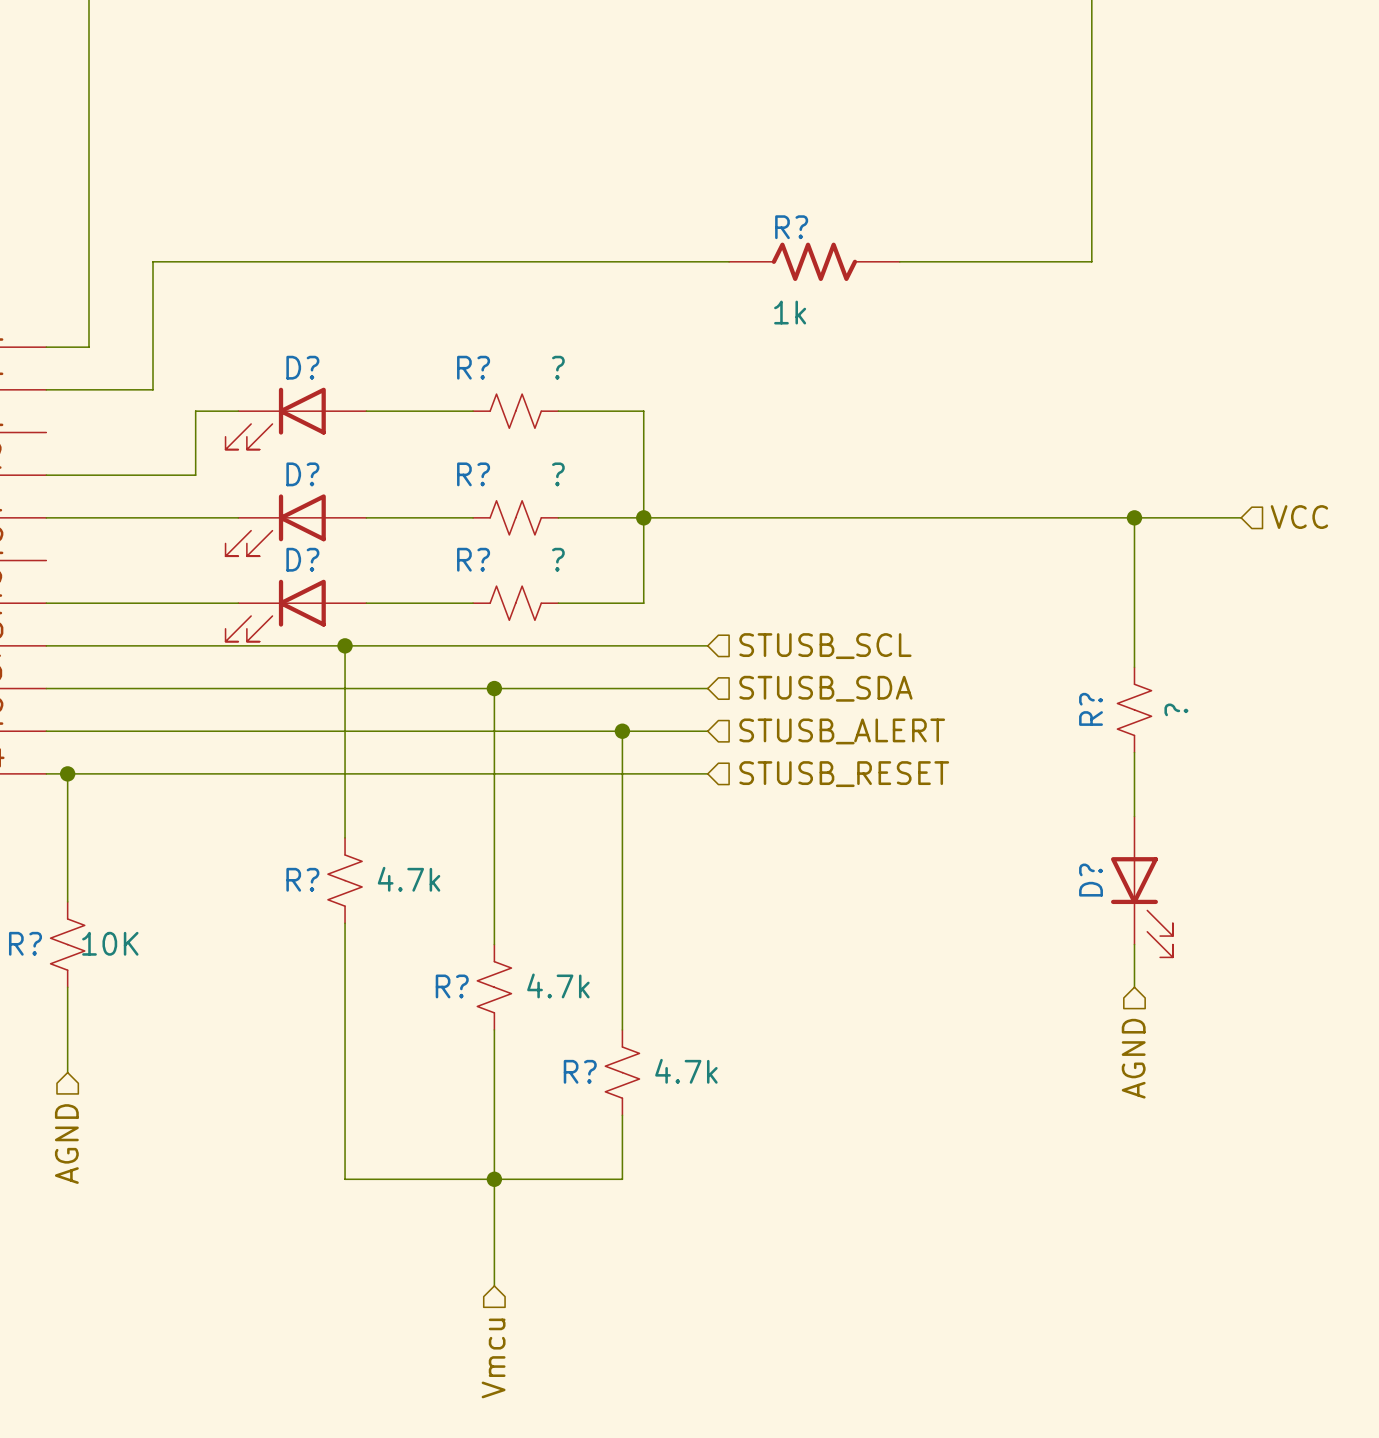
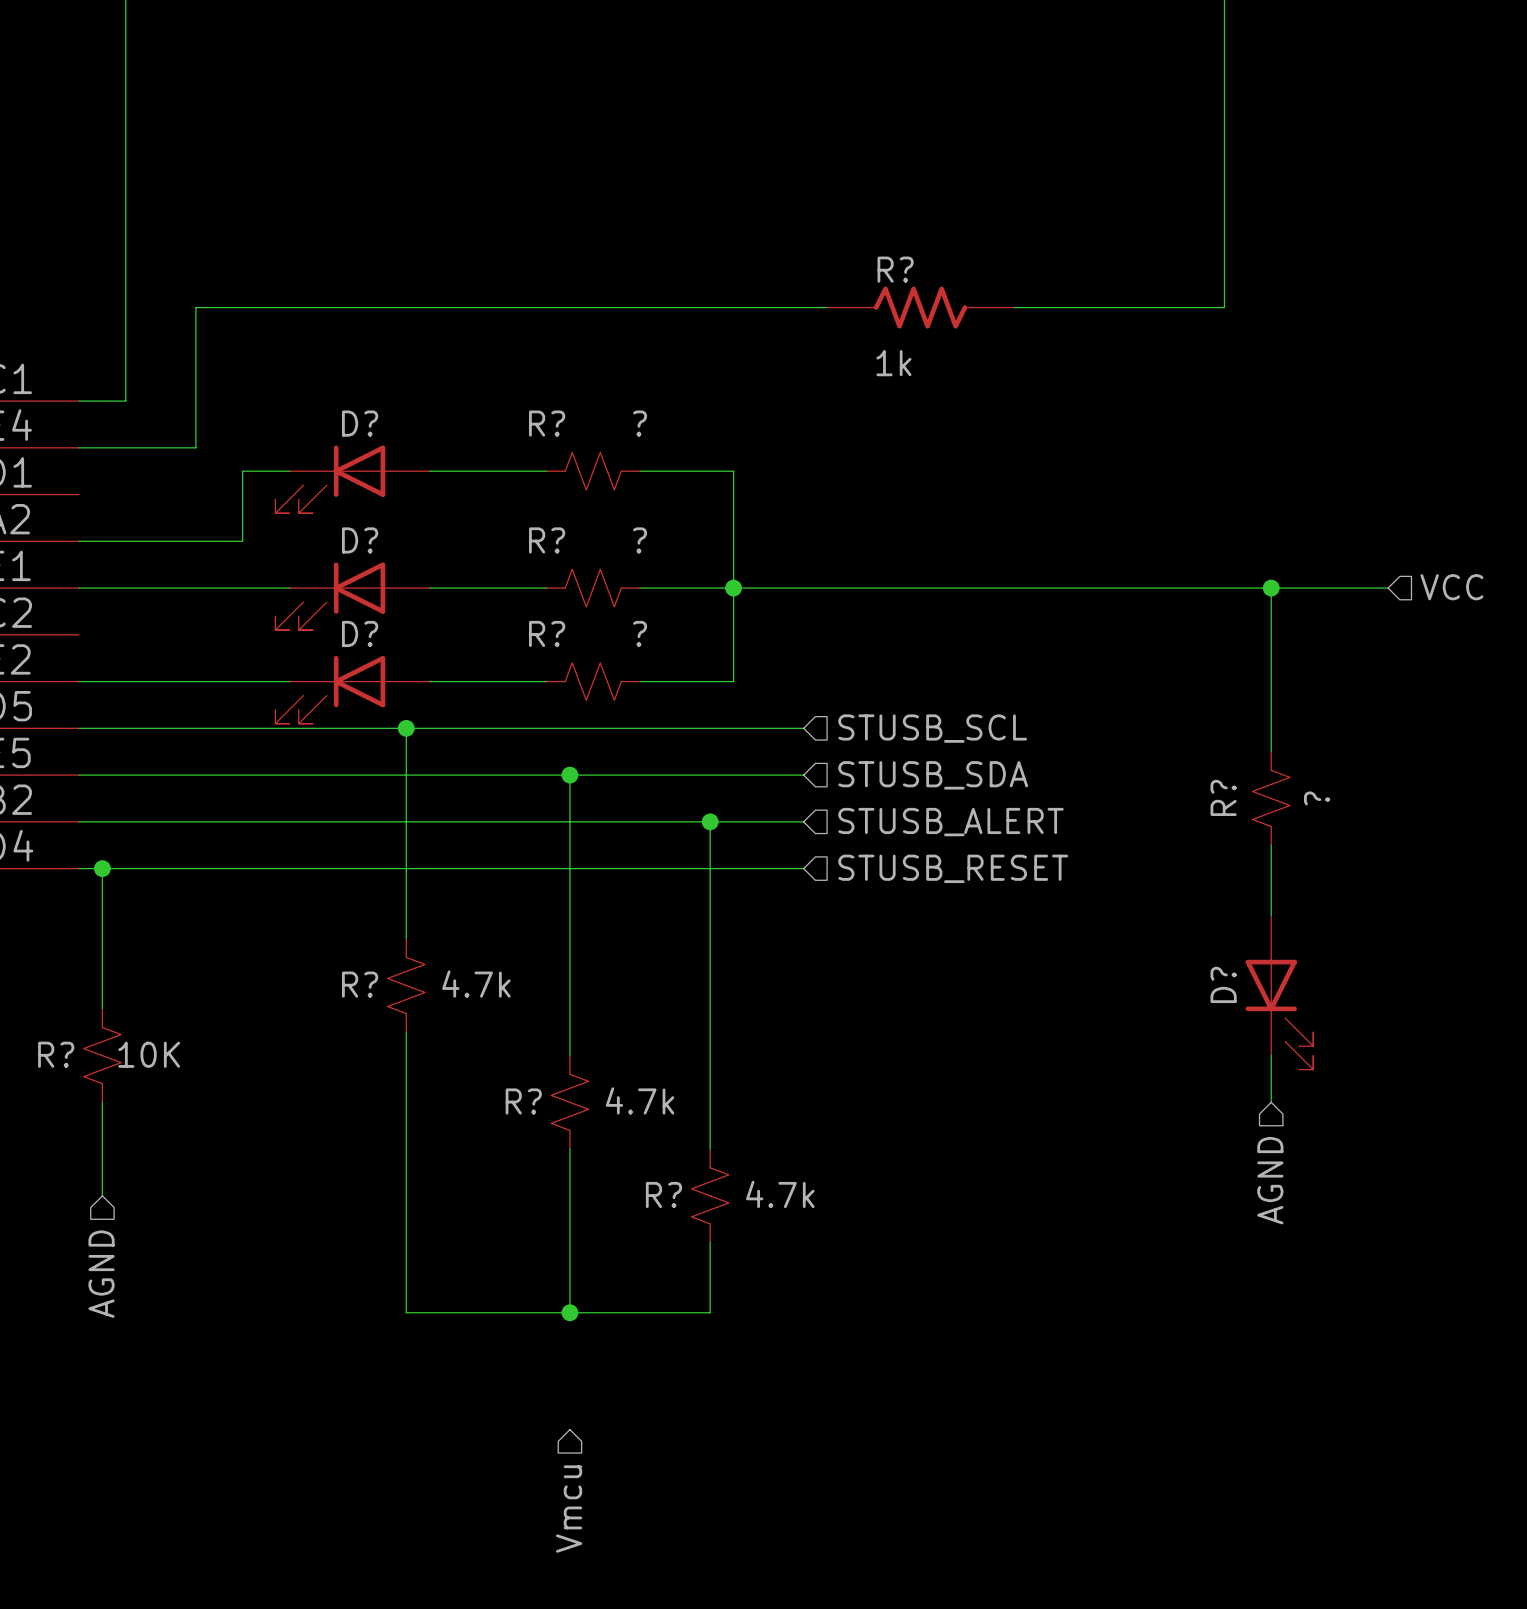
wire: (494, 1179) (494, 1285) -> none

